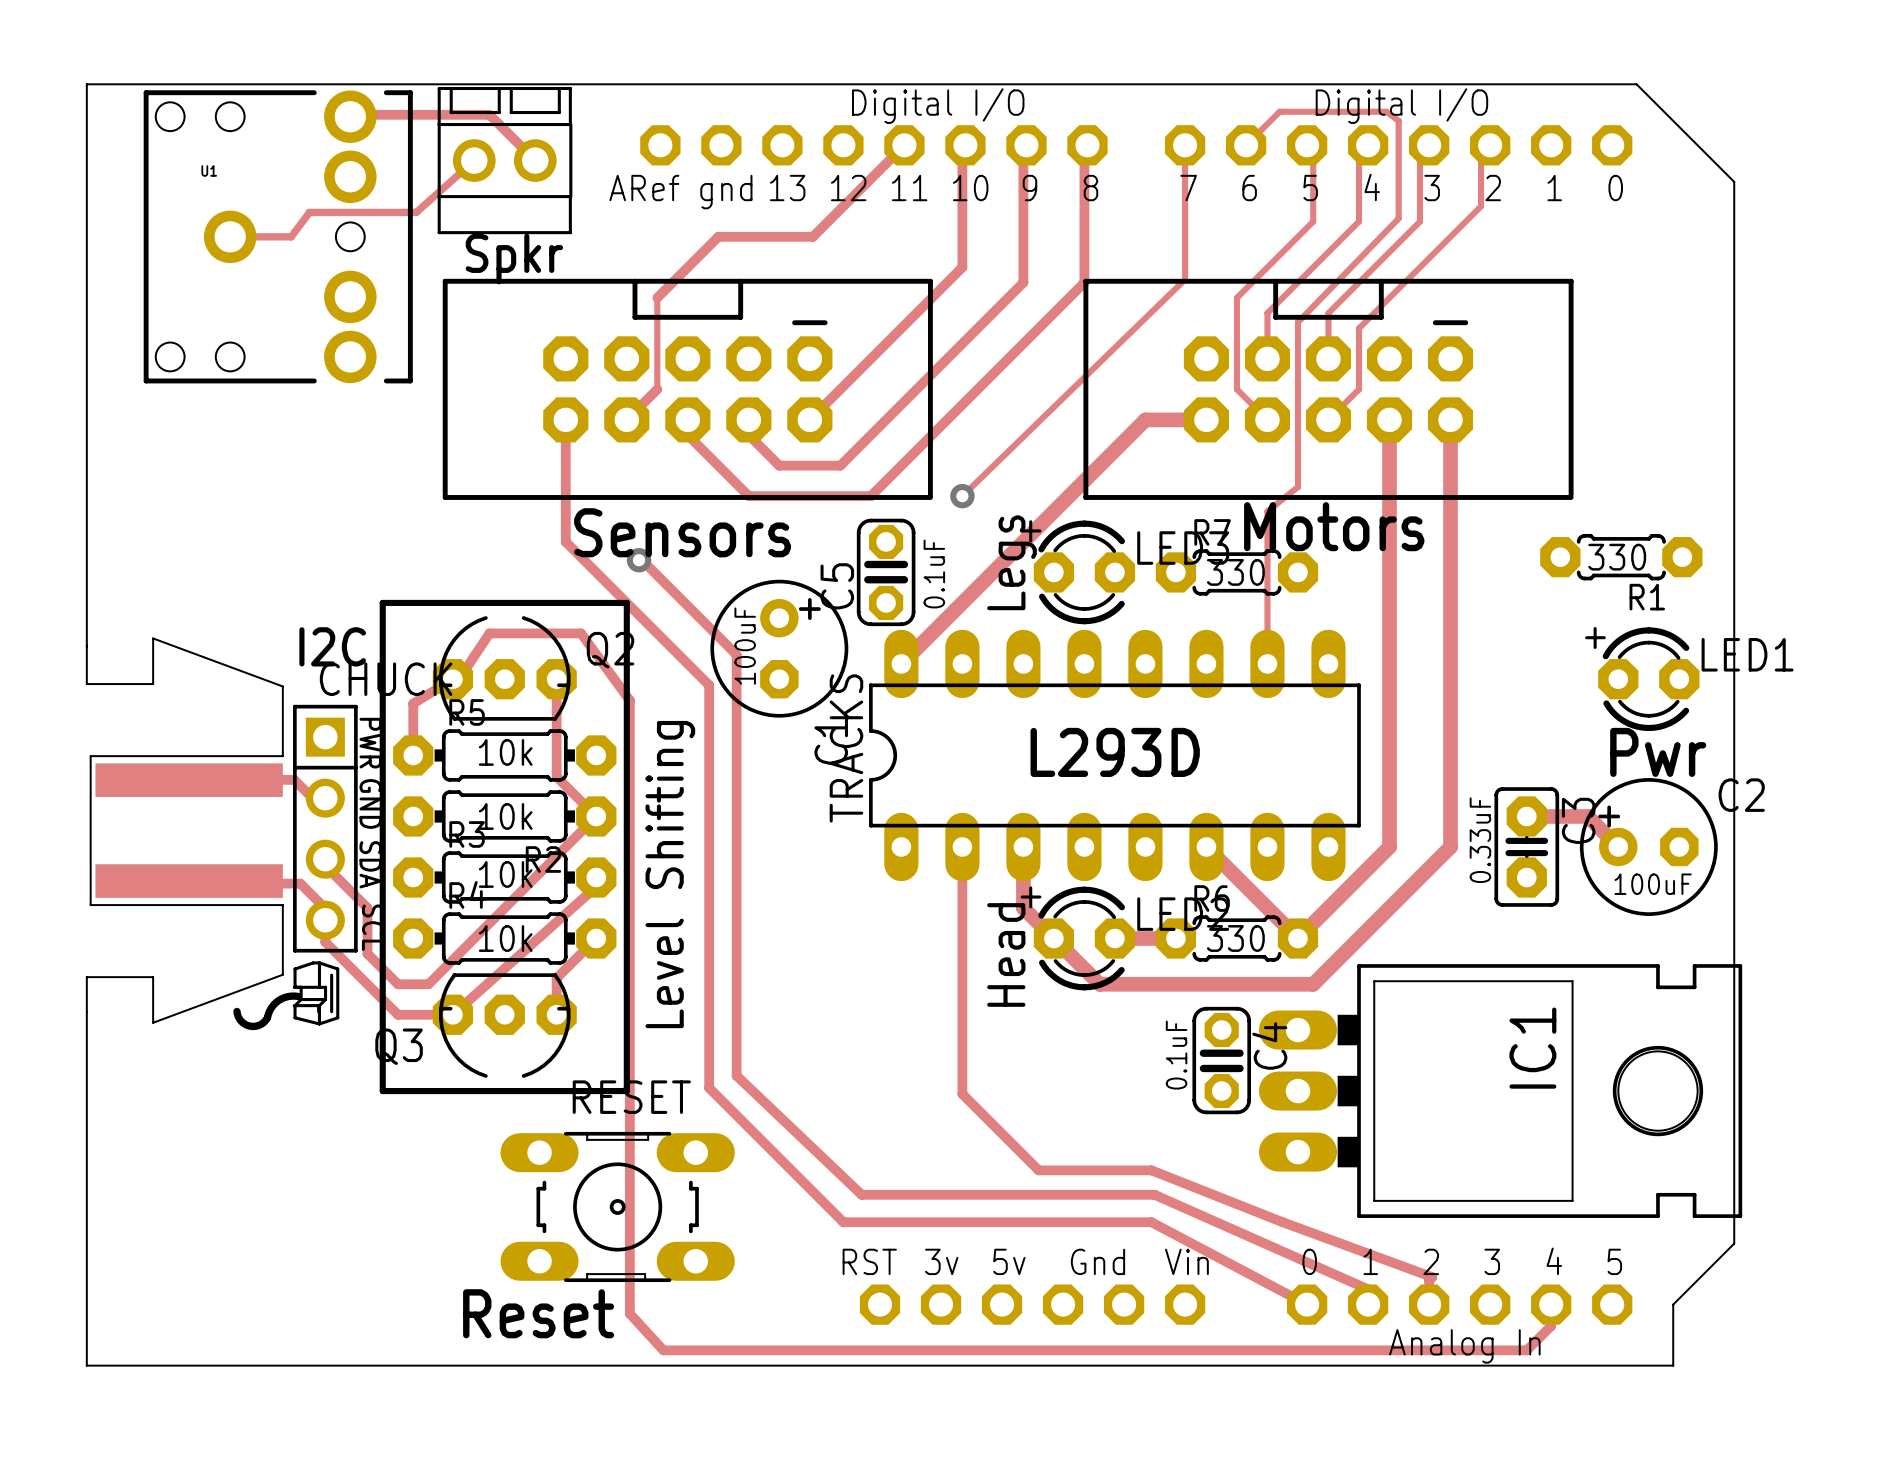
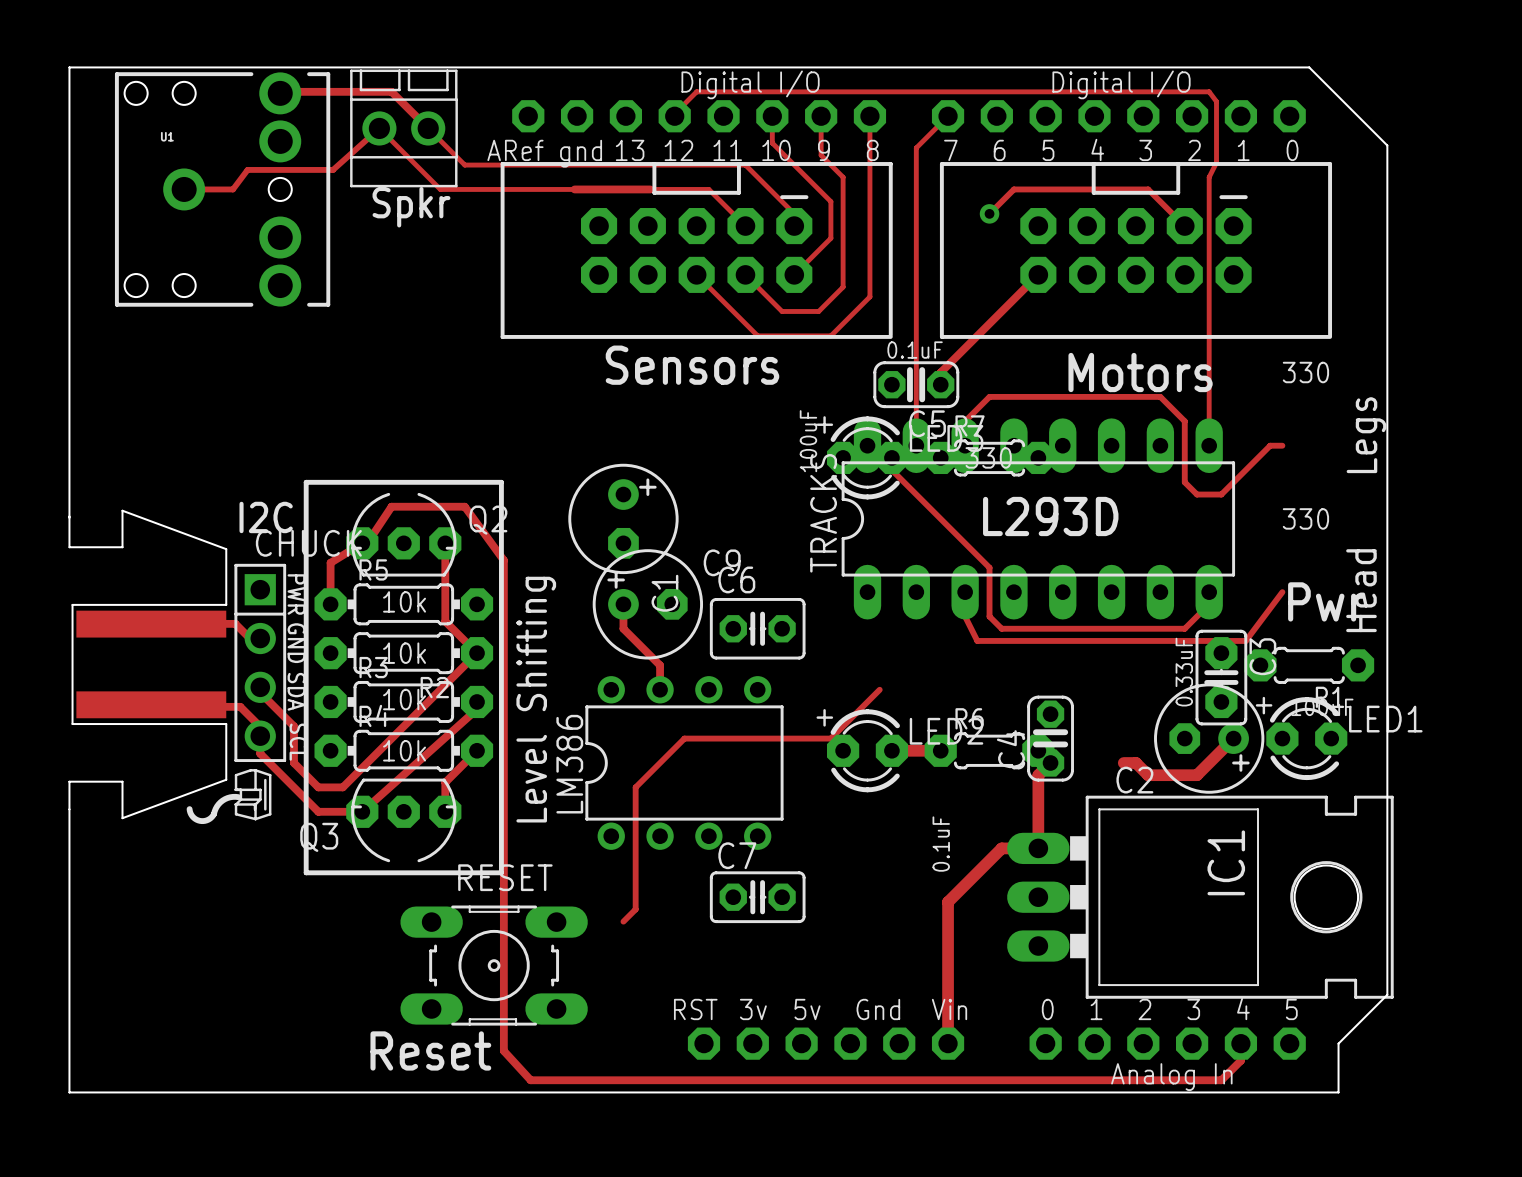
track: none -> (674, 116) (674, 113) (696, 91) (1209, 91) (1216, 101) (1216, 162) (1209, 177) (1209, 445)
track: (904, 145) (812, 236) -> (745, 226) (708, 189) (650, 189)
track: (965, 145) (962, 148) (962, 267) (809, 419) -> (772, 116) (772, 143) (830, 201) (830, 238) (794, 274)
track: (1026, 145) (1023, 148) (1023, 282) (840, 465) (779, 465) (748, 435) (748, 419) -> (821, 116) (821, 155) (843, 177) (843, 287) (818, 311) (782, 311) (745, 274)
track: (1087, 145) (1084, 148) (1084, 282) (870, 496) (748, 496) (687, 435) (687, 419) -> (869, 116) (869, 296) (830, 335) (757, 335) (696, 274)
track: (1185, 145) (1185, 279) (962, 496) -> (948, 116) (916, 147) (916, 445)
track: (1246, 145) (1279, 111) (1386, 111) (1398, 120) (1398, 218) (1297, 322) (1297, 487) (1267, 511) (1267, 663) -> none
track: (1307, 145) (1313, 151) (1313, 221) (1236, 297) (1236, 389) (1267, 419) -> none
track: (1368, 145) (1359, 154) (1359, 221) (1267, 313) (1267, 358) -> none
track: (1429, 145) (1420, 154) (1420, 221) (1328, 313) (1328, 358) -> none
track: (1490, 145) (1481, 154) (1481, 206) (1359, 328) (1359, 389) (1328, 419) -> none
track: none -> (428, 128) (464, 165) (745, 165) (794, 213) (794, 226)
track: (718, 236) (657, 297) (657, 389) (626, 419) -> (574, 189) (440, 189) (379, 128)
track: none -> (989, 213) (1013, 189) (1148, 189) (1184, 226)
via: none -> (989, 213)
track: none -> (1038, 274) (940, 372) (940, 384)
part position: (687, 389) -> (696, 250)
part position: (1328, 389) -> (1135, 250)
track: (565, 419) (565, 541) (709, 685) (709, 1088) (843, 1222) (1151, 1222) (1307, 1304) -> none
track: (1206, 419) (1145, 419) (901, 663) -> none
track: (1389, 419) (1389, 846) (1297, 938) (1206, 846) -> none
track: (1450, 419) (1450, 846) (1313, 984) (1099, 984) (1023, 908) (1023, 846) -> none
text: none -> 330 (1305, 372)
via: (962, 496) -> none
text position: Motors (1334, 526) -> Motors (1140, 372)
text position: Sensors (682, 532) -> Sensors (692, 365)
text: none -> Legs (1366, 435)
track: none -> (867, 445) (989, 567) (989, 616) (1001, 628) (1184, 628) (1209, 604) (1209, 592)
track: none -> (965, 445) (965, 421) (989, 396) (1160, 396) (1184, 421) (1184, 482) (1196, 494) (1221, 494) (1270, 445) (1282, 445)
text: 330 (1617, 557) -> none
R1 position: (1621, 557) -> (1309, 665)
track: (639, 560) (642, 560) (736, 654) (736, 1075) (861, 1194) (1154, 1194) (1368, 1289) (1368, 1304) -> none
via: (639, 560) -> none
text: Legs (1012, 562) -> none
C5 rotation: 0° (886, 572) -> 90° counterclockwise (916, 384)
C5 position: (886, 572) -> (916, 384)
text rotation: 0° (934, 573) -> 90° clockwise (915, 350)
text position: 0.1uF (934, 573) -> 0.1uF (915, 350)
text position: 100uF (745, 646) -> 100uF (808, 441)
text: none -> 330 (1305, 518)
LED1 position: (1642, 679) -> (1301, 738)
text: none -> Head (1361, 590)
track: none -> (965, 592) (965, 616) (977, 640) (1245, 640) (1282, 592)
text position: L293D (1115, 752) -> L293D (1050, 516)
track: none -> (623, 604) (623, 628) (660, 665) (660, 689)
C9: none -> (647, 604)
TRACKS position: (1114, 755) -> (1038, 518)
C6: none -> (757, 628)
track: (1526, 816) (1587, 816) (1618, 846) -> none
track: (962, 846) (962, 1094) (1038, 1170) (1151, 1170) (1282, 1222) (1432, 1277) (1429, 1280) (1429, 1304) -> none
C2 rotation: 0° (1648, 846) -> 180° (1209, 738)
C2 position: (1648, 846) -> (1209, 738)
track: none -> (879, 689) (830, 738) (684, 738) (635, 787) (635, 909) (623, 921)
track: none -> (1233, 738) (1196, 775) (1148, 775) (1135, 762) (1123, 762)
text: 330 (1235, 938) -> none
LM386: none -> (684, 762)
track: none -> (1050, 762) (1038, 775) (1038, 848) (1001, 848) (948, 902) (948, 1043)
text: Head (1006, 954) -> none
C4 rotation: 0° (1221, 1060) -> 180° (1050, 738)
C4 position: (1221, 1060) -> (1050, 738)
IC1 position: (1500, 1091) -> (1200, 897)
C7: none -> (757, 897)

